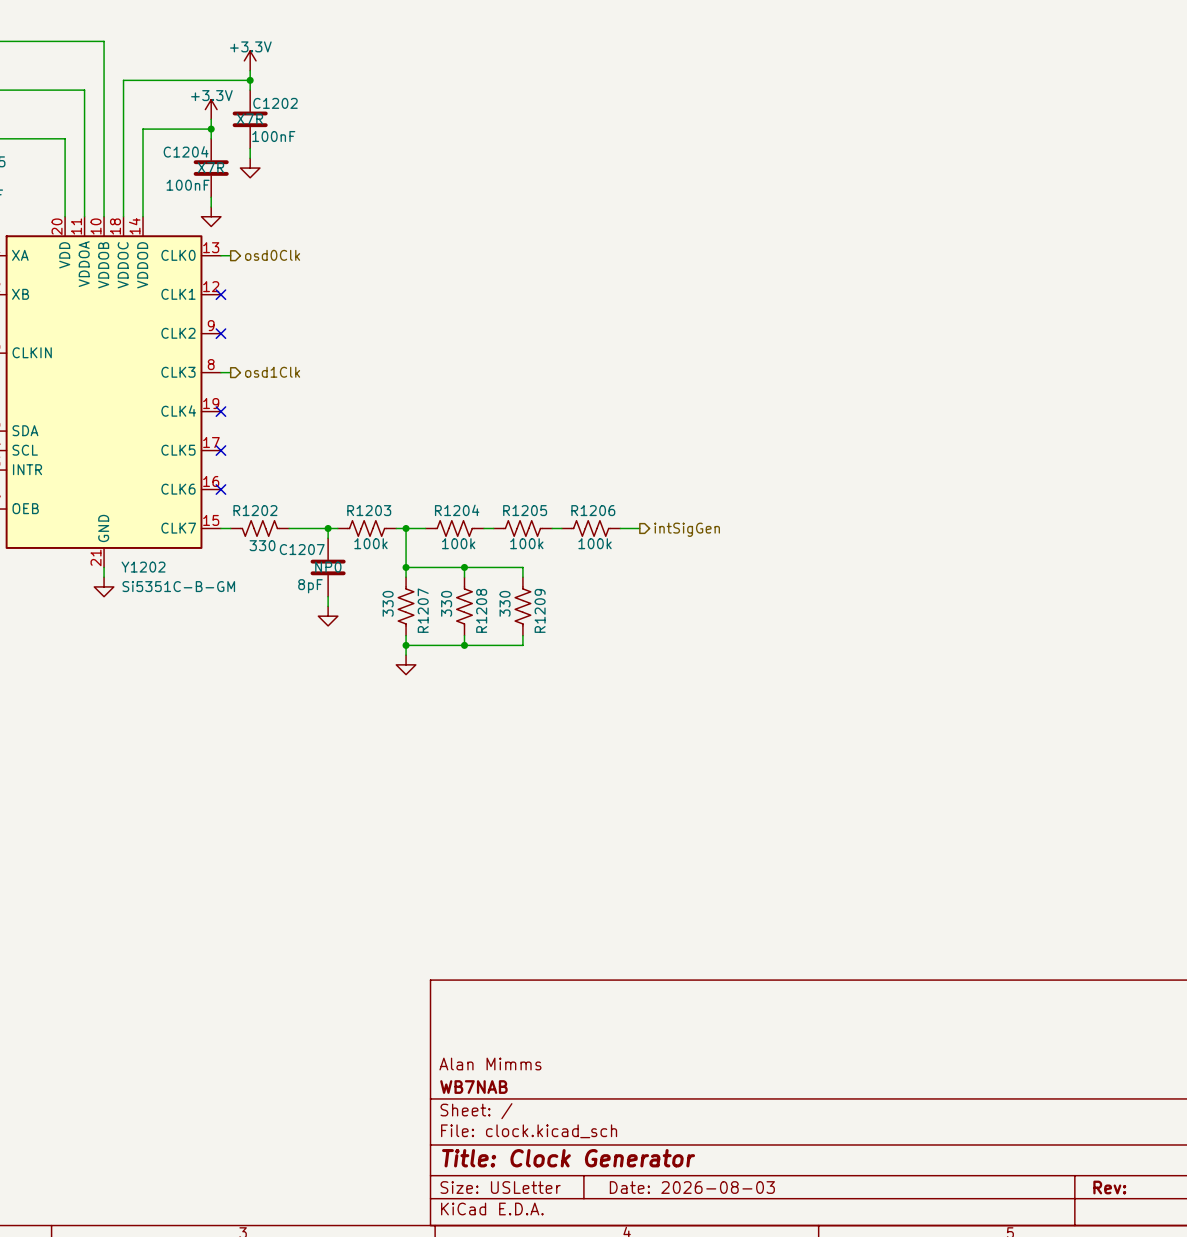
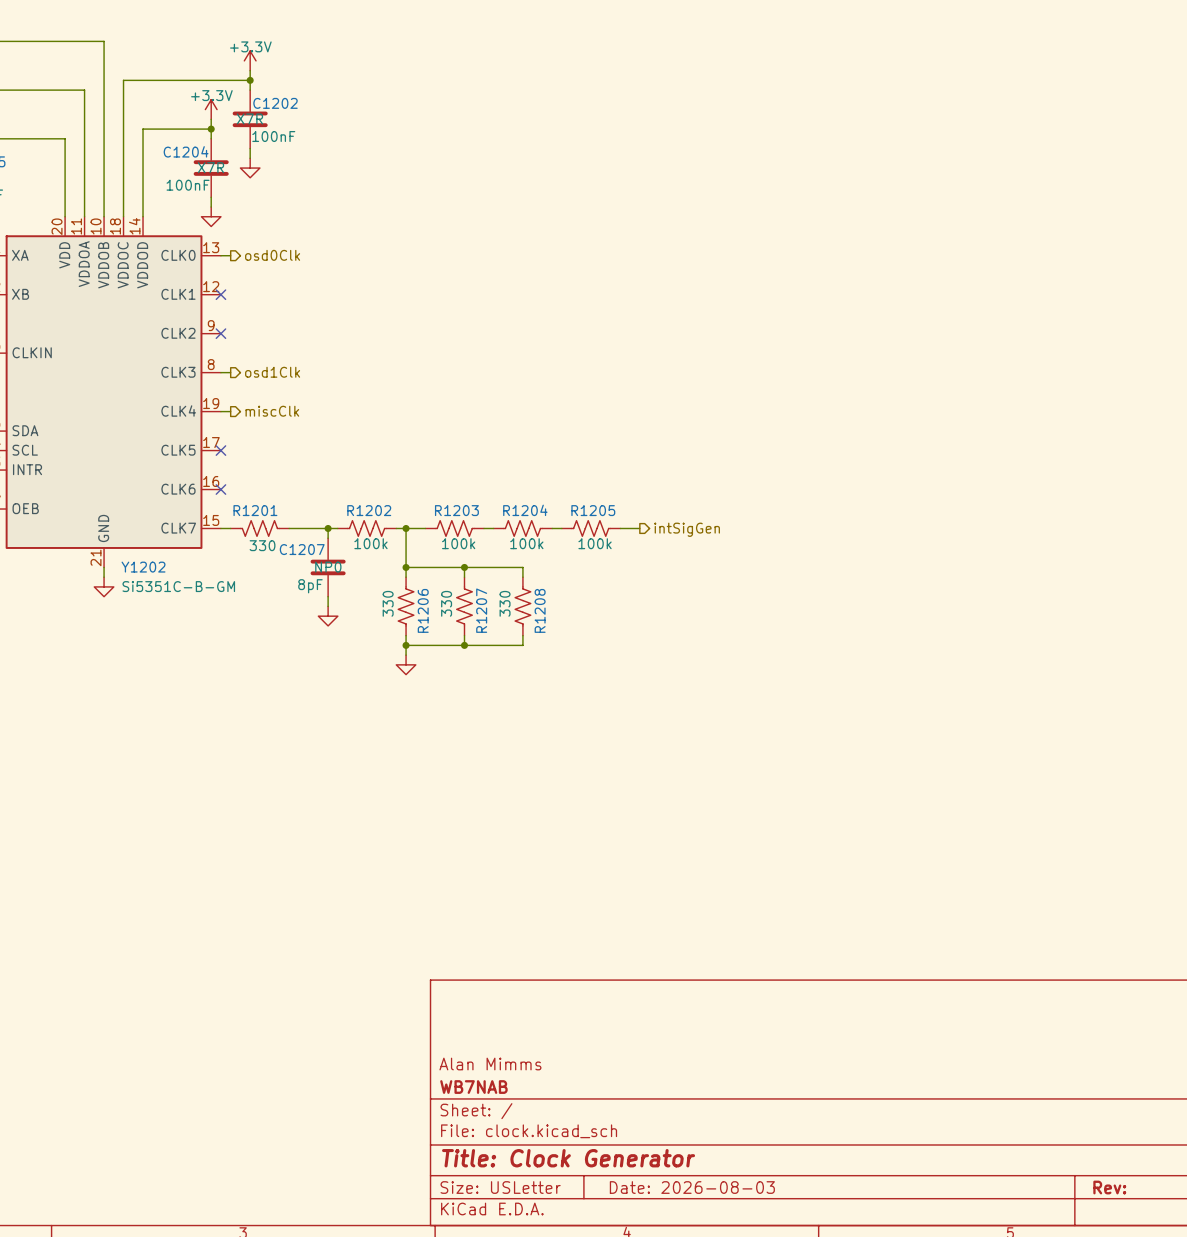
wire: none -> (220, 411) (230, 411)
no-connect mark: (220, 411) -> none
hierarchical label: none -> miscClk (272, 411)
R1202 name: R1202 (255, 510) -> R1201 (255, 510)
R1203 name: R1203 (369, 510) -> R1202 (369, 510)
R1204 name: R1204 (457, 510) -> R1203 (456, 510)
R1205 name: R1205 (525, 510) -> R1204 (525, 510)
R1206 name: R1206 (593, 510) -> R1205 (593, 510)
R1207 name: R1207 (423, 610) -> R1206 (423, 610)
R1208 name: R1208 (481, 610) -> R1207 (481, 610)
R1209 name: R1209 (540, 610) -> R1208 (540, 610)

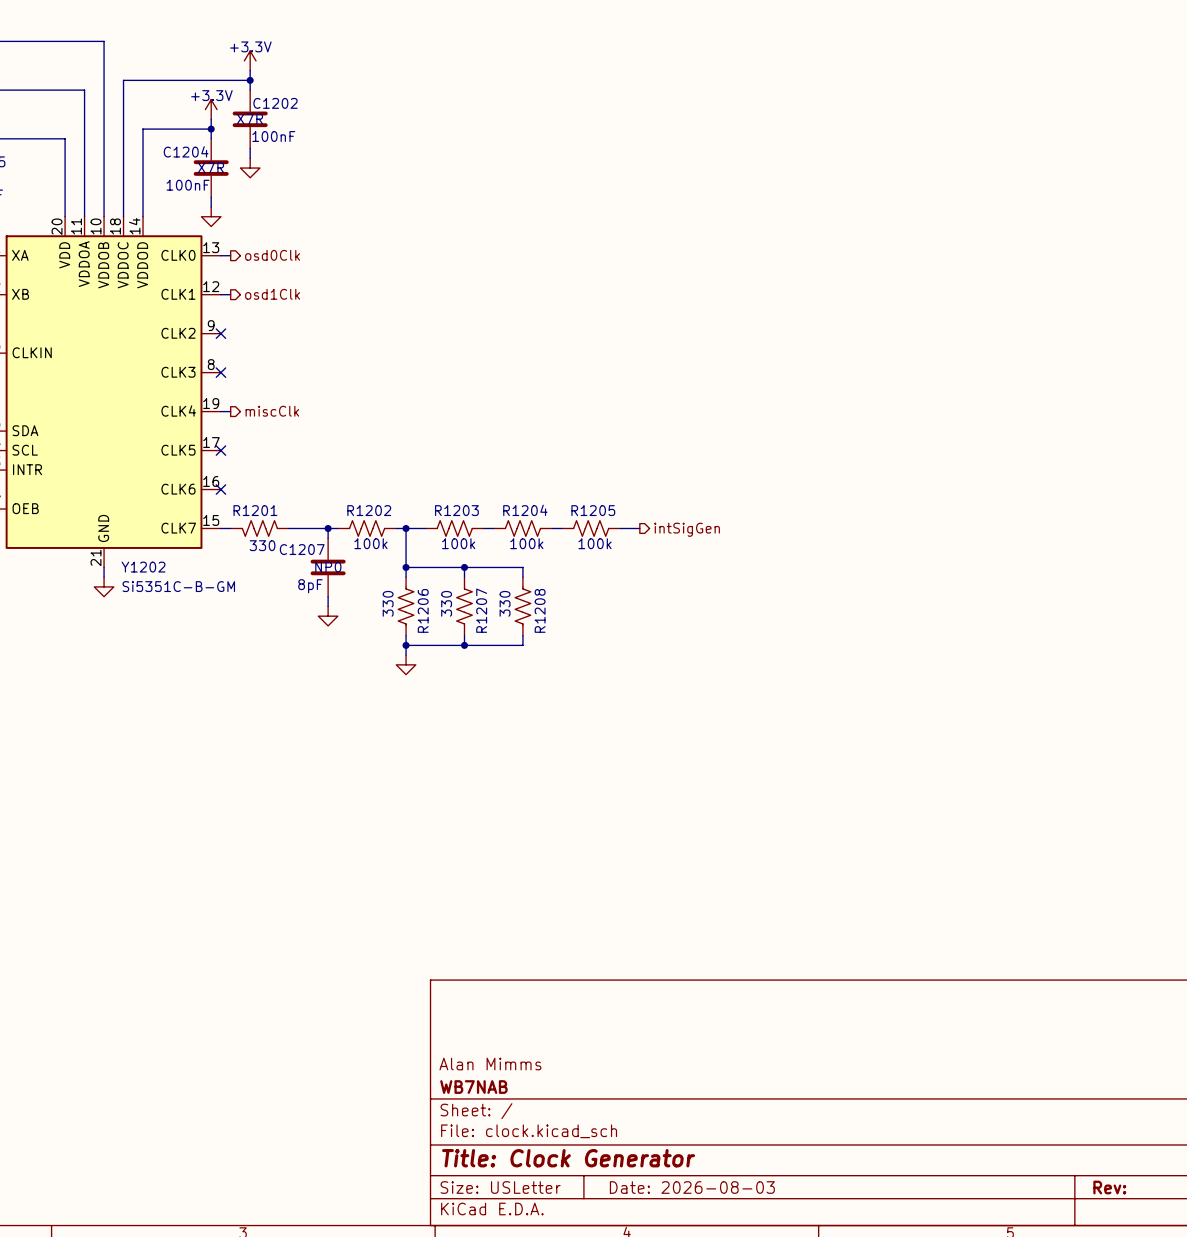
no-connect mark: (220, 294) -> none
wire: (220, 372) (230, 372) -> (220, 294) (230, 294)
no-connect mark: none -> (220, 372)
hierarchical label position: osd1Clk (272, 372) -> osd1Clk (272, 294)

